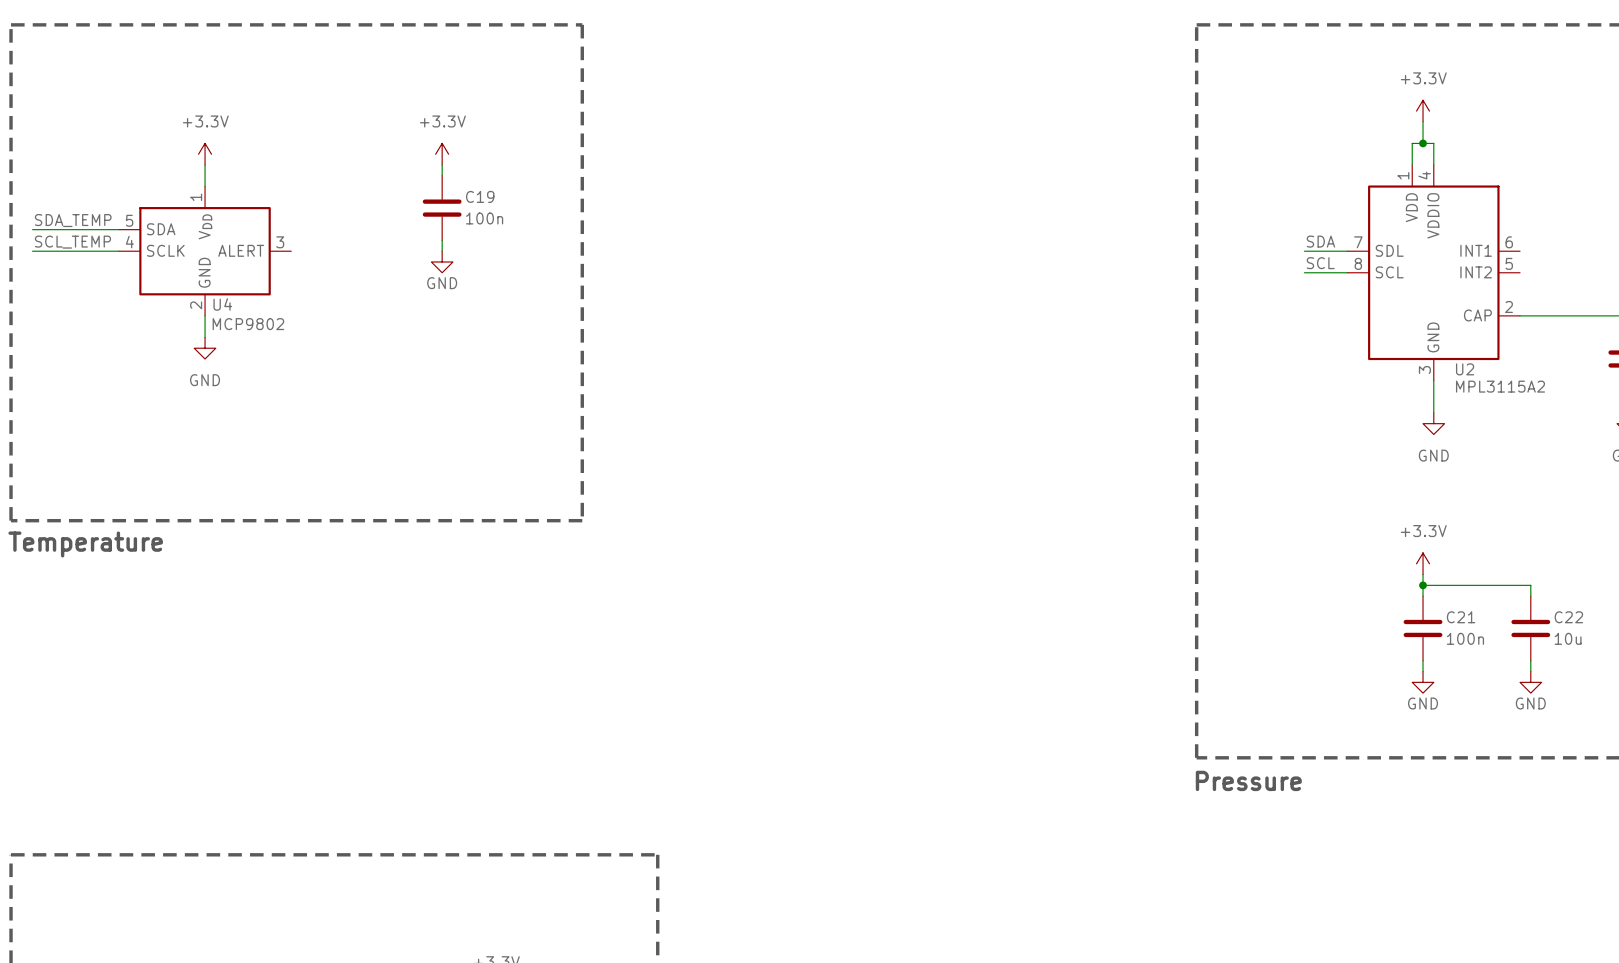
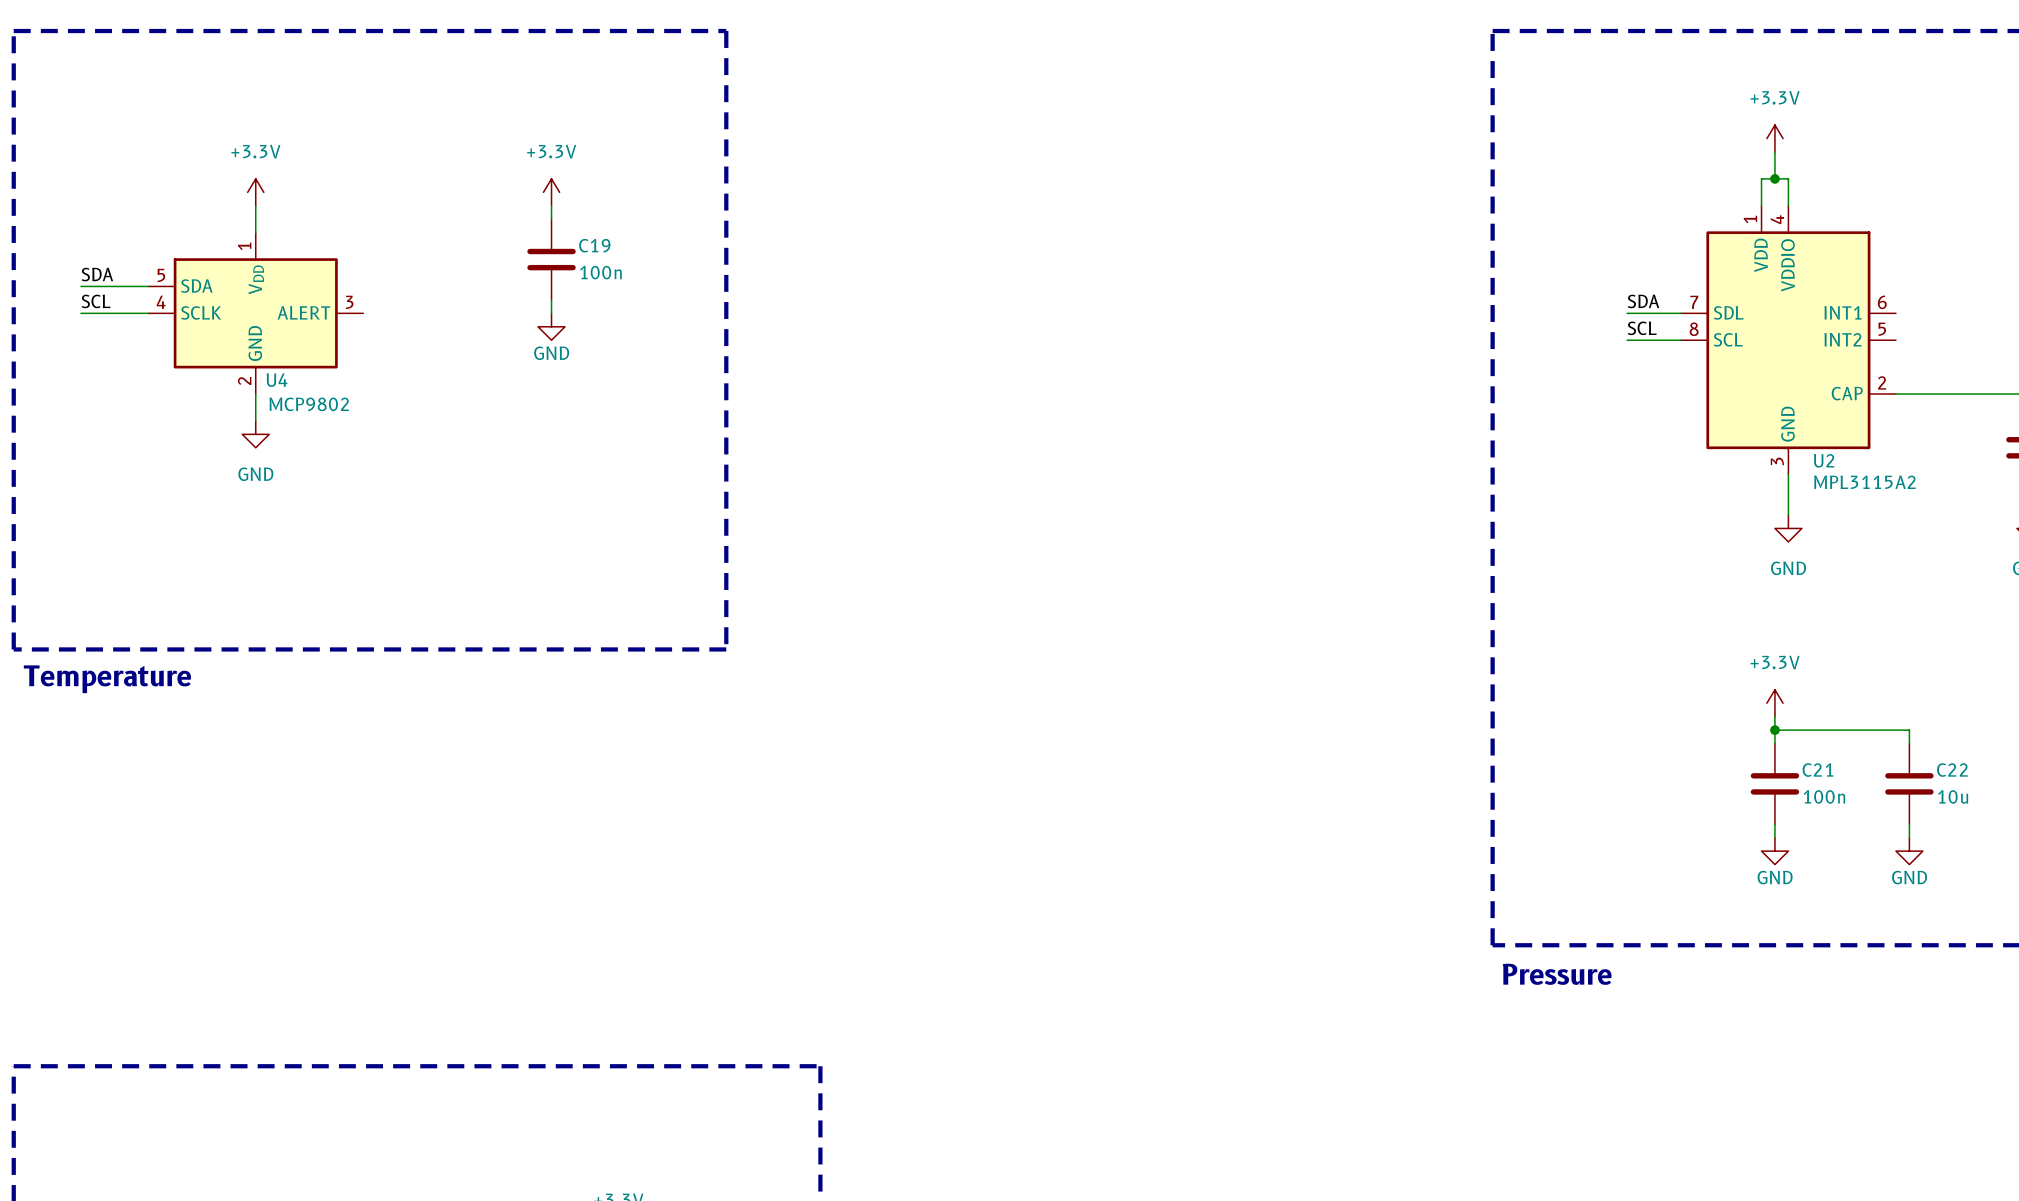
label: SDA_TEMP (73, 220) -> none
label: none -> SDA (97, 274)
wire: (32, 229) (64, 229) -> none
label: none -> SCL (96, 301)
label: SCL_TEMP (72, 242) -> none
wire: (32, 251) (64, 251) -> none

